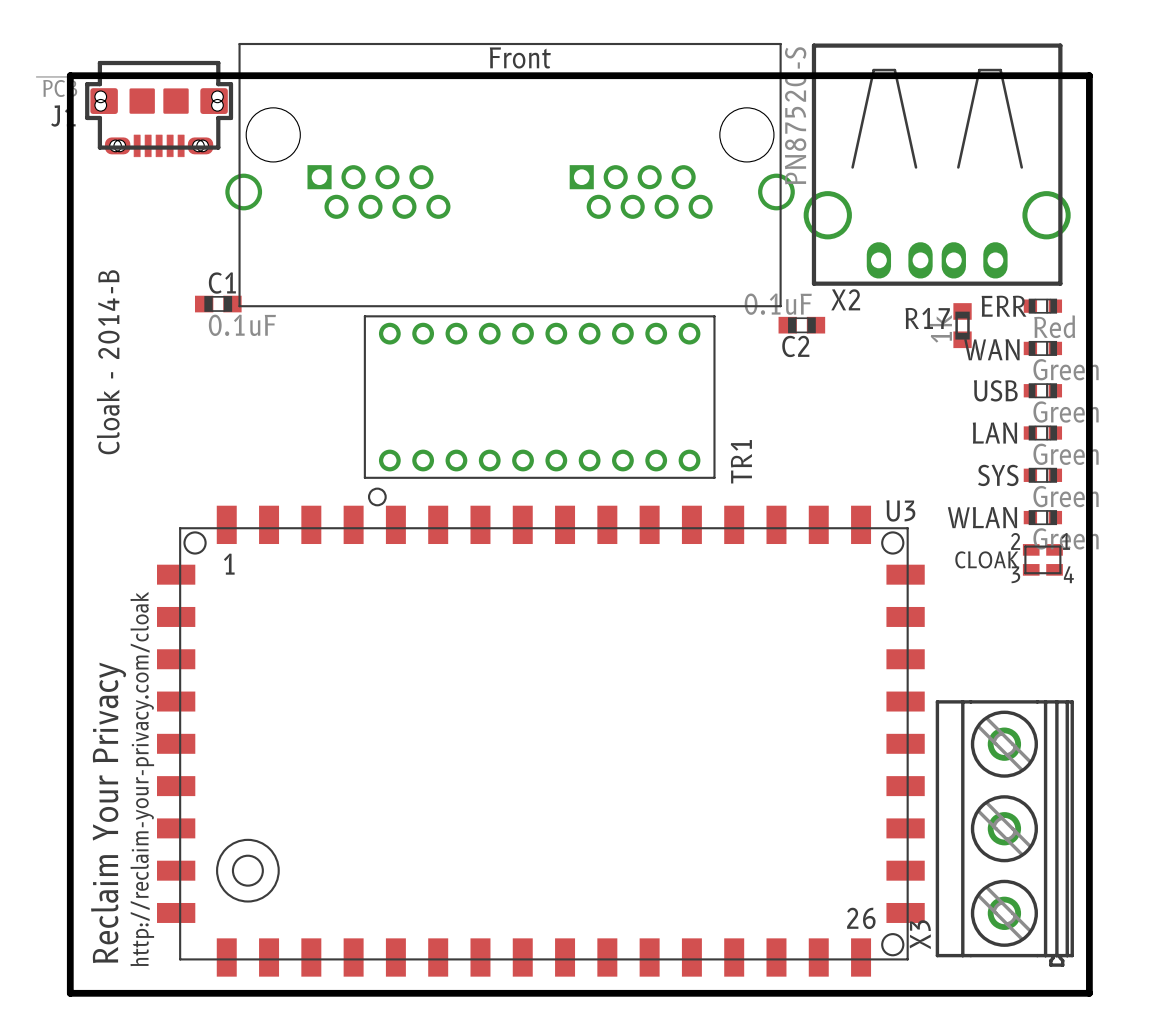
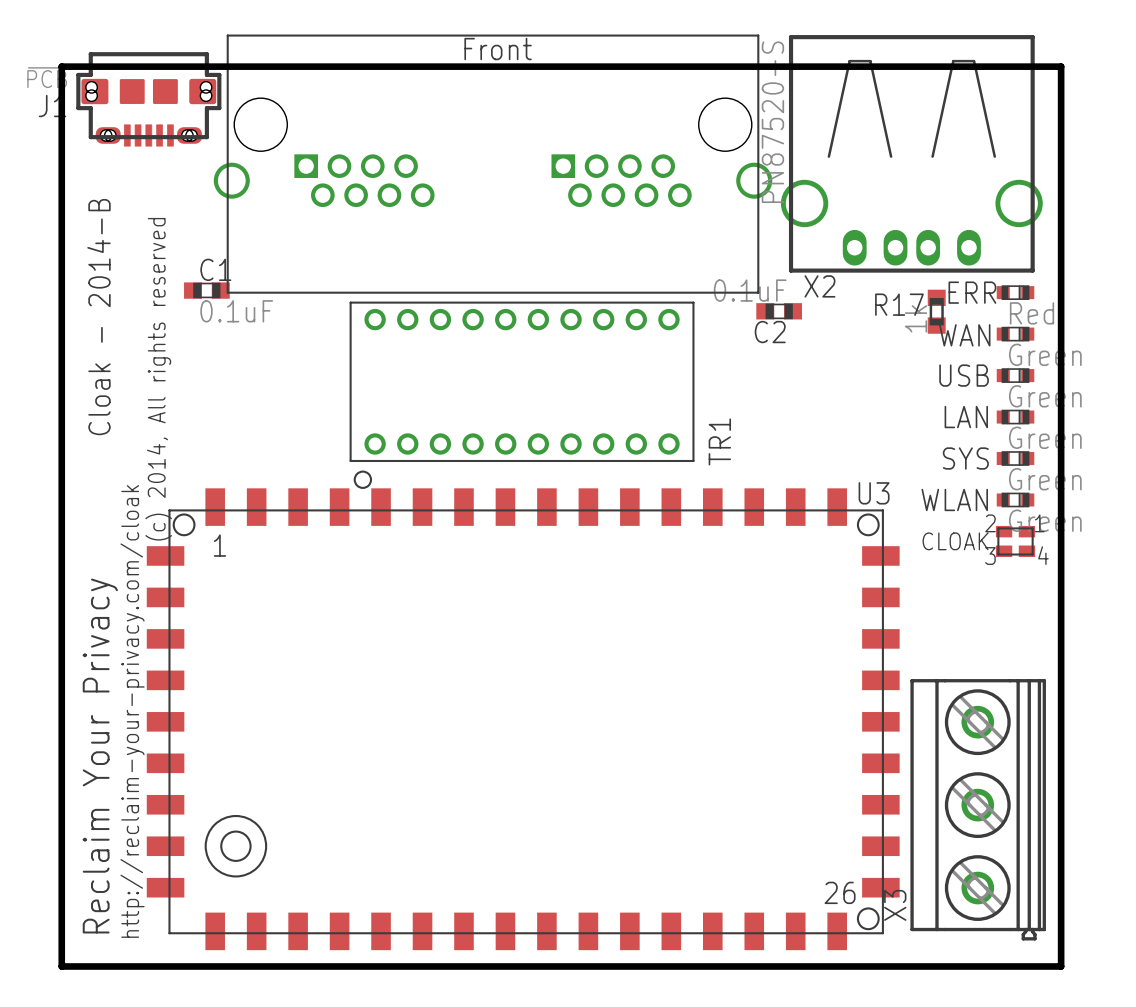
text: none -> (c) 2014, All rights reserved (158, 379)

